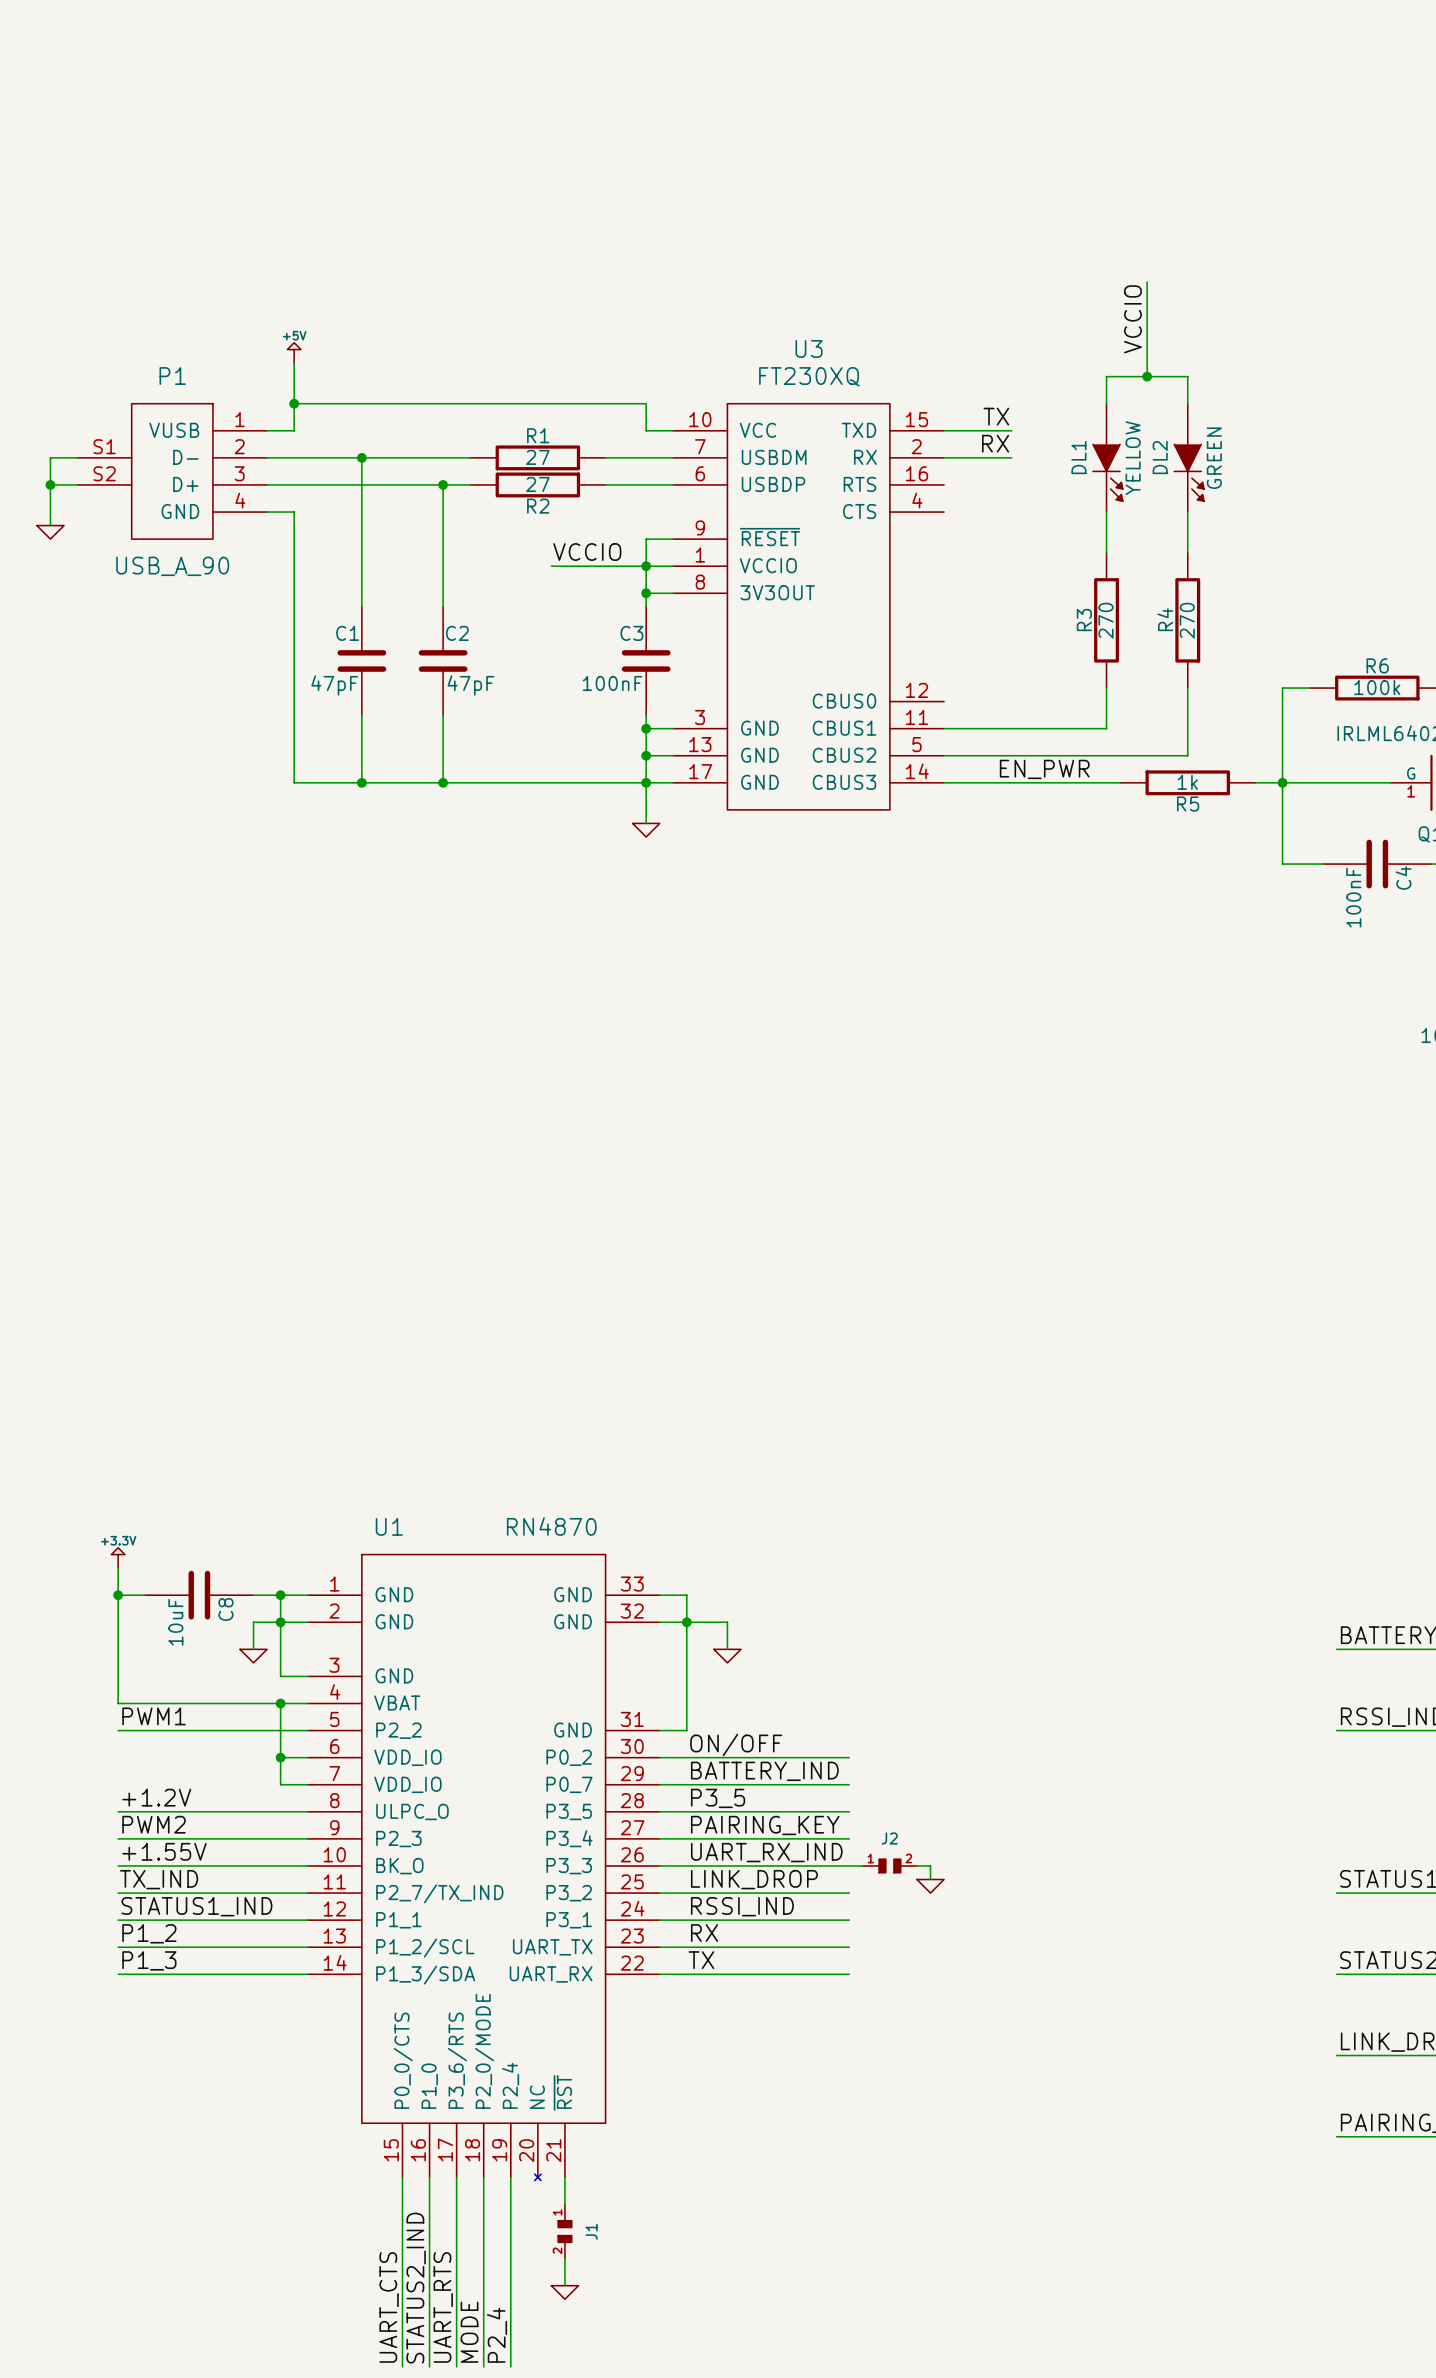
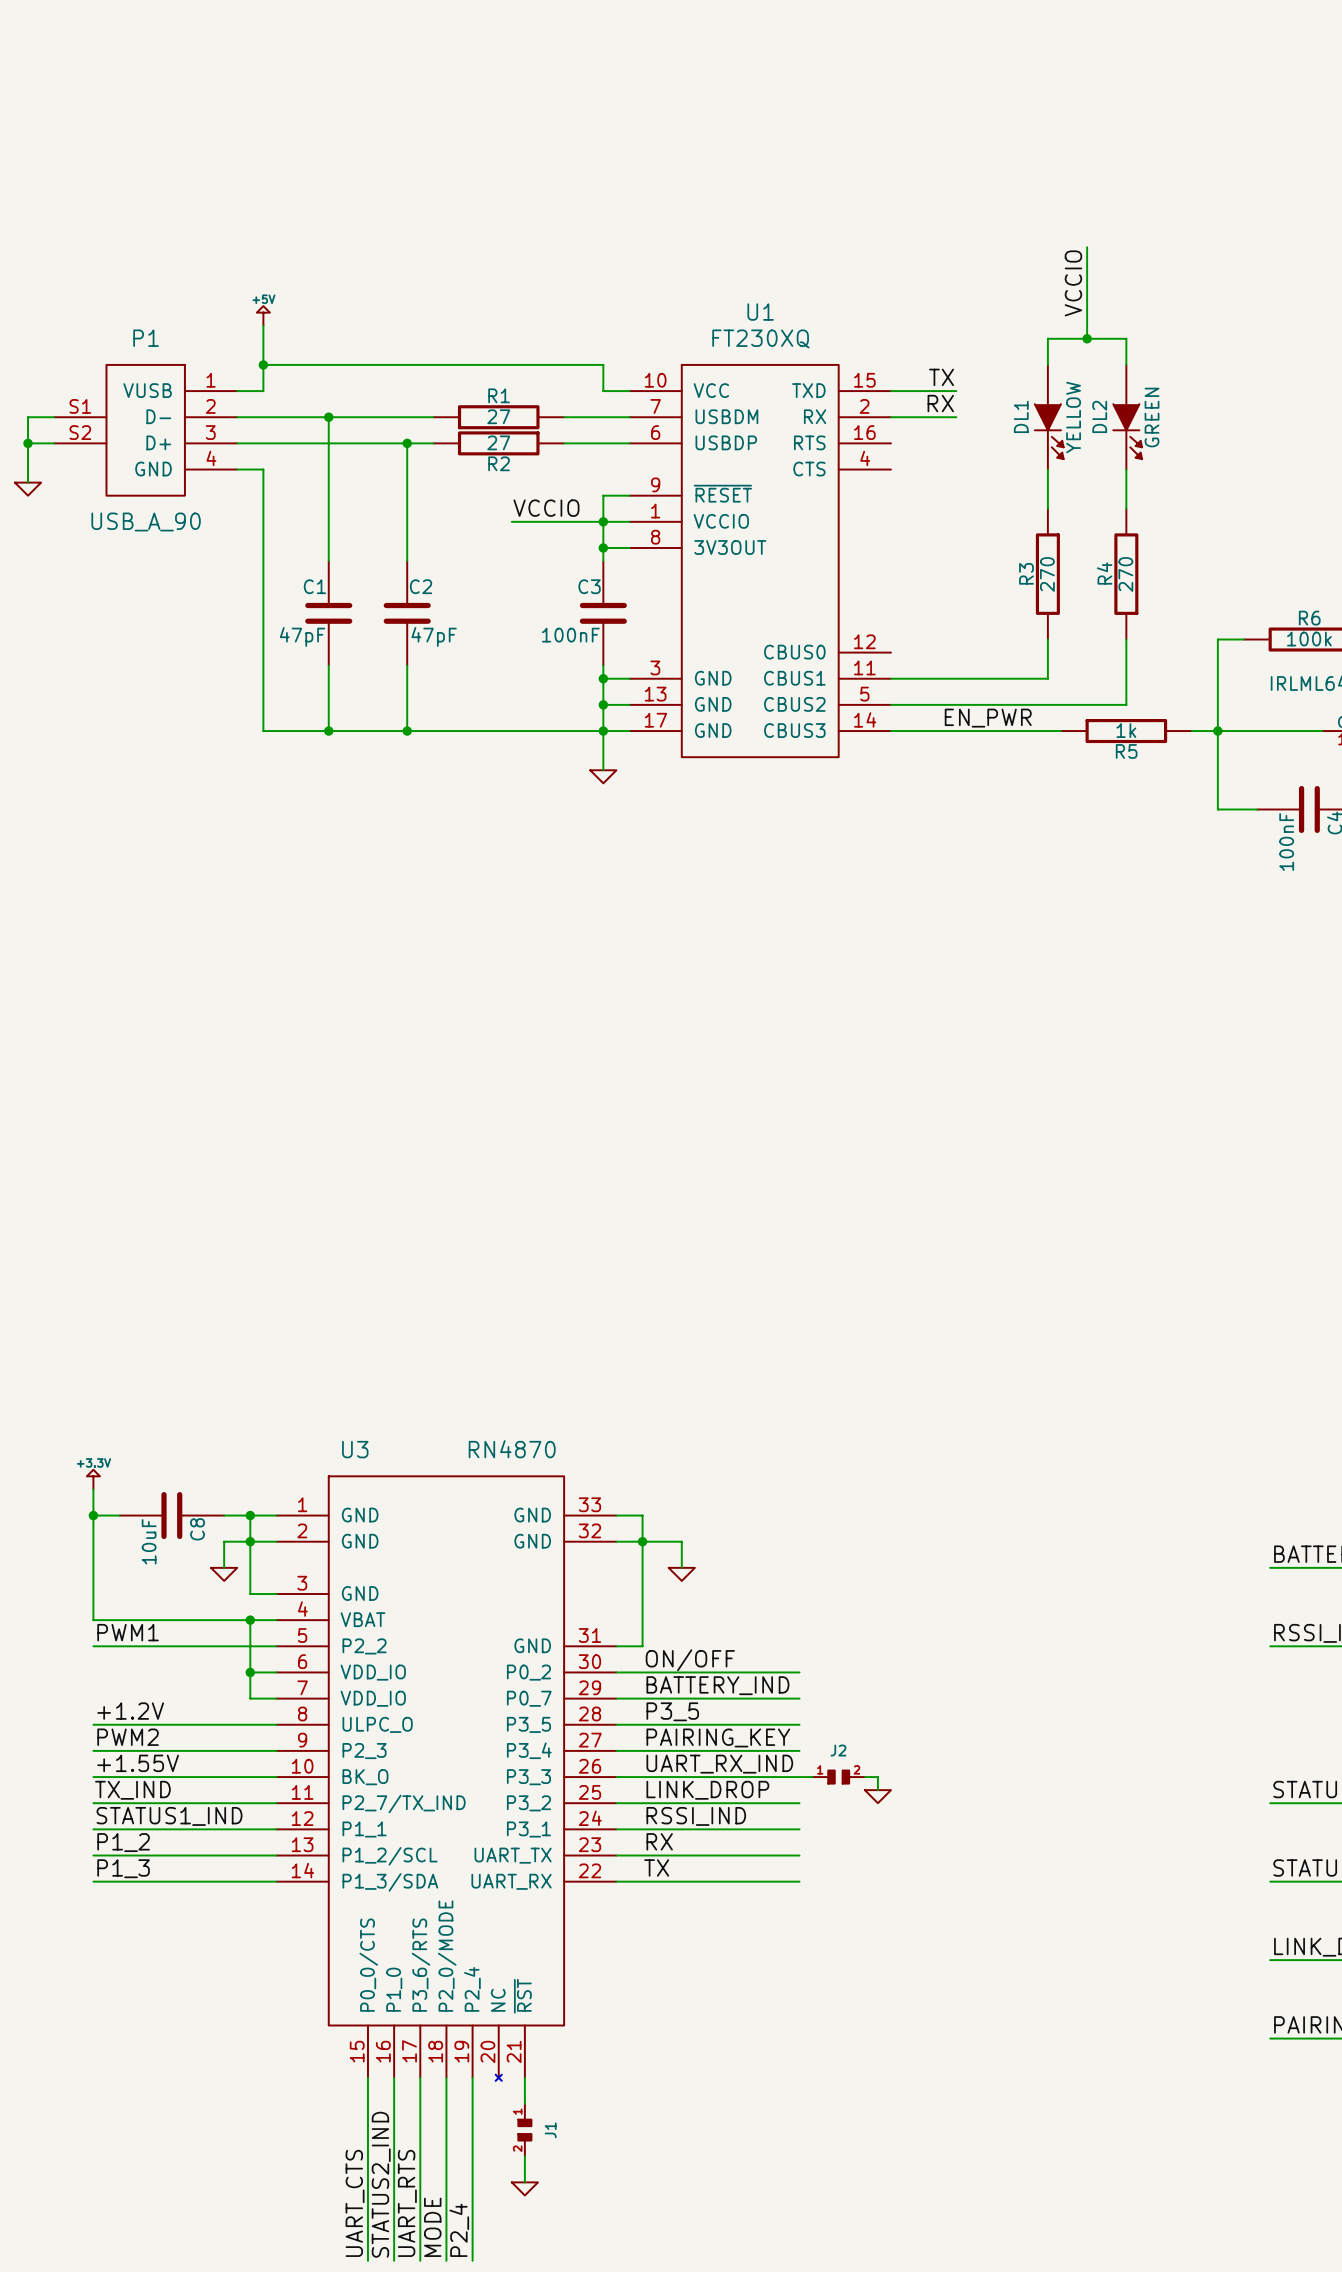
U3 name: U3 (809, 348) -> U1 (760, 312)
U1 name: U1 (389, 1526) -> U3 (355, 1449)

